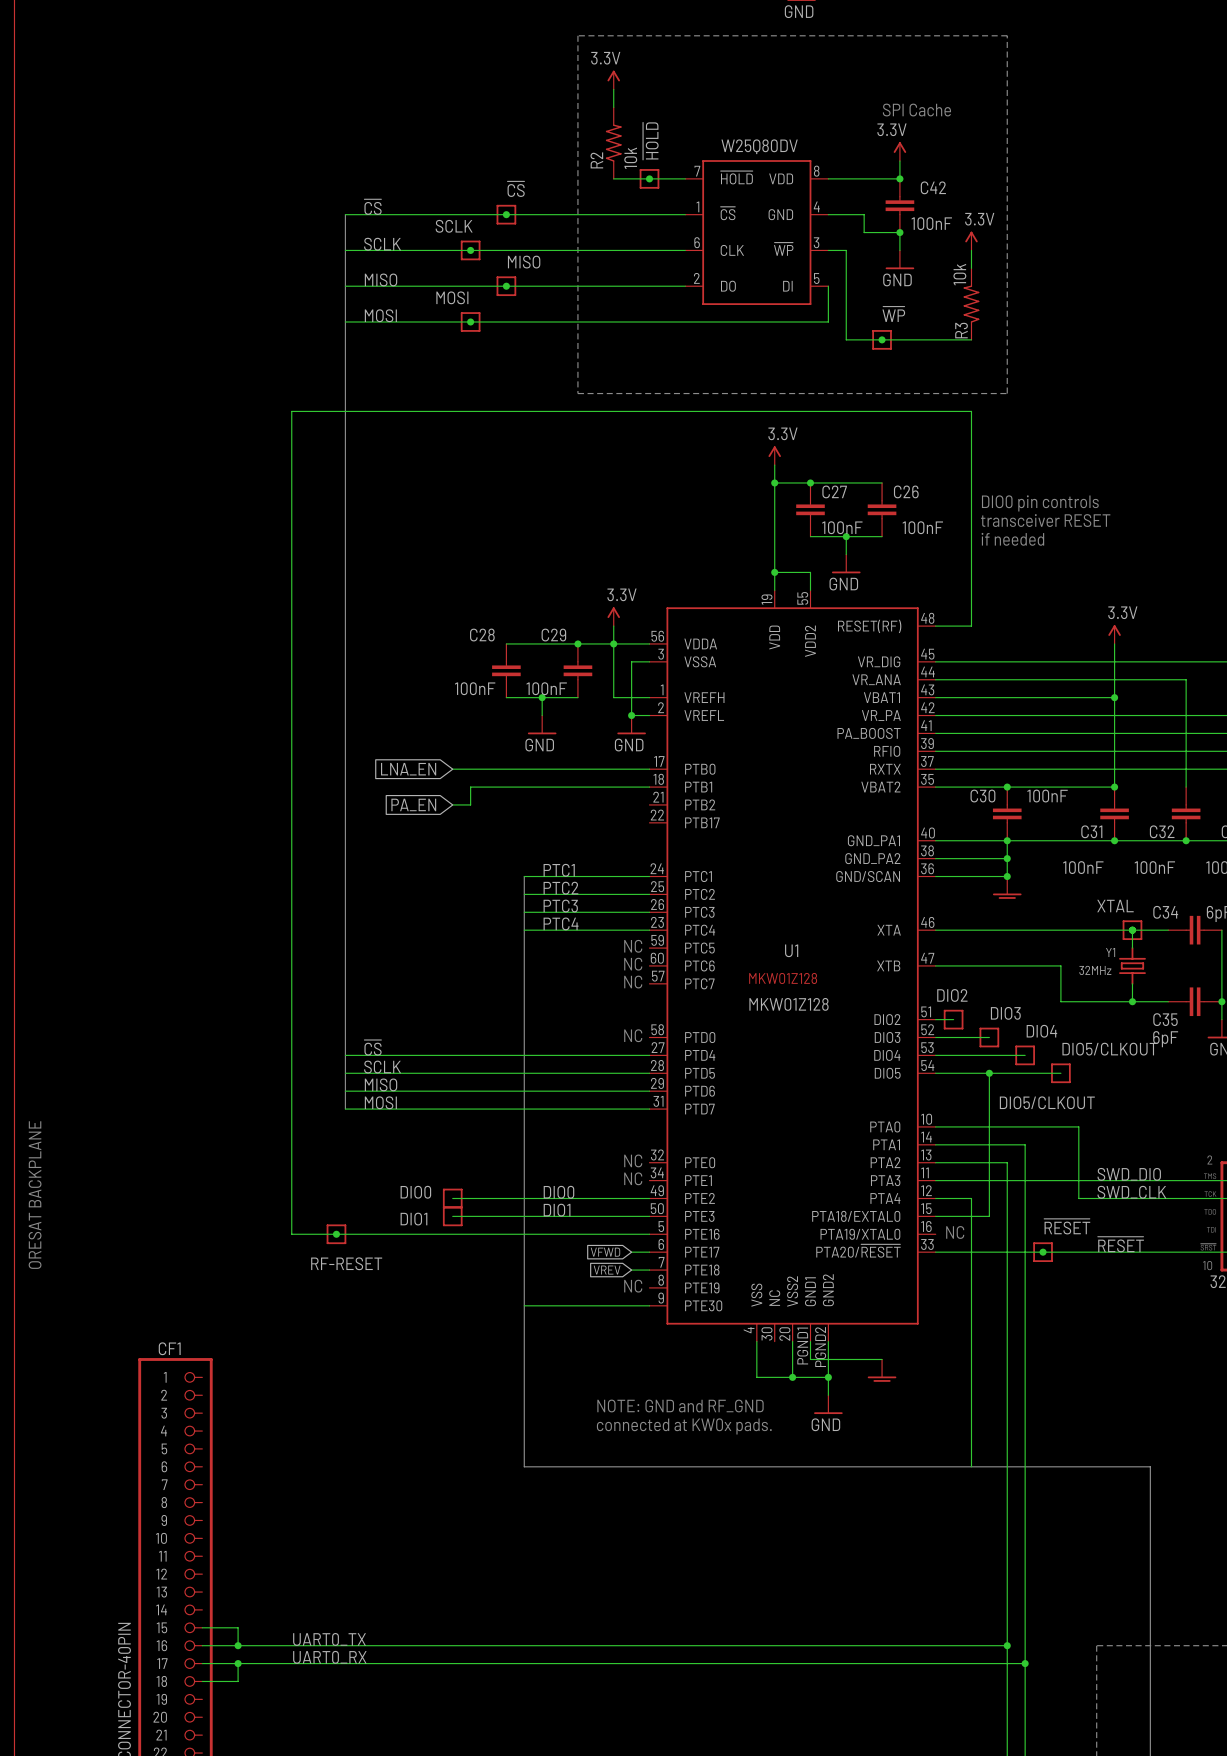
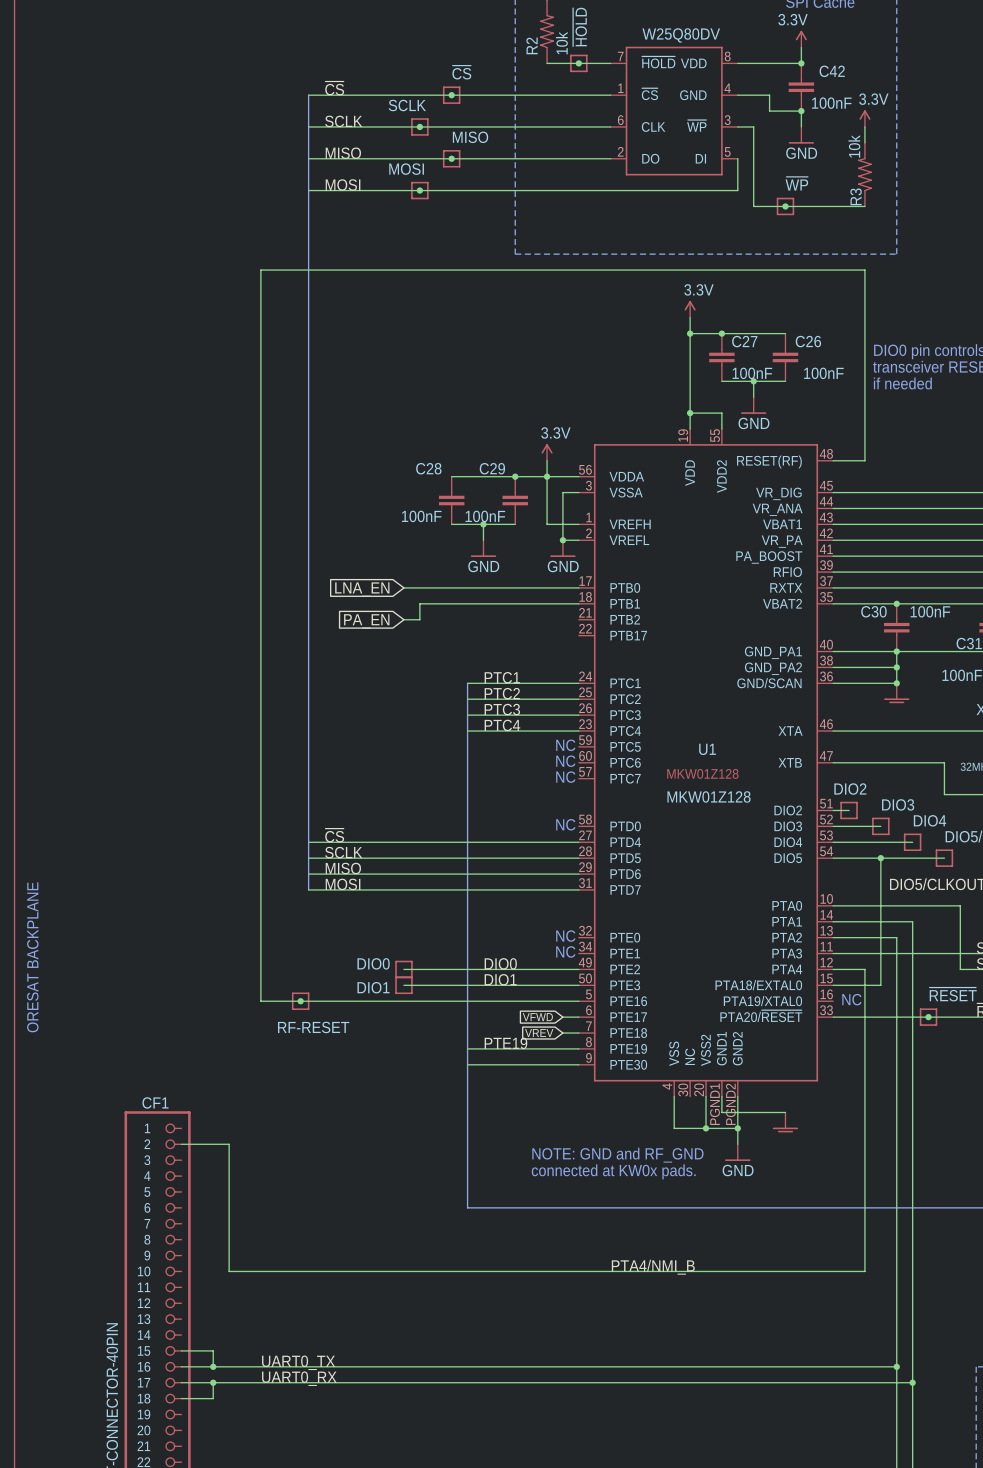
label: none -> PTE19 (505, 1043)
text: NC (633, 1286) -> none
wire: none -> (467, 1048) (578, 1048)
wire: none -> (181, 1144) (229, 1144) (229, 1271) (864, 1271) (864, 1207)
label: none -> PTA4/NMI_B (653, 1267)

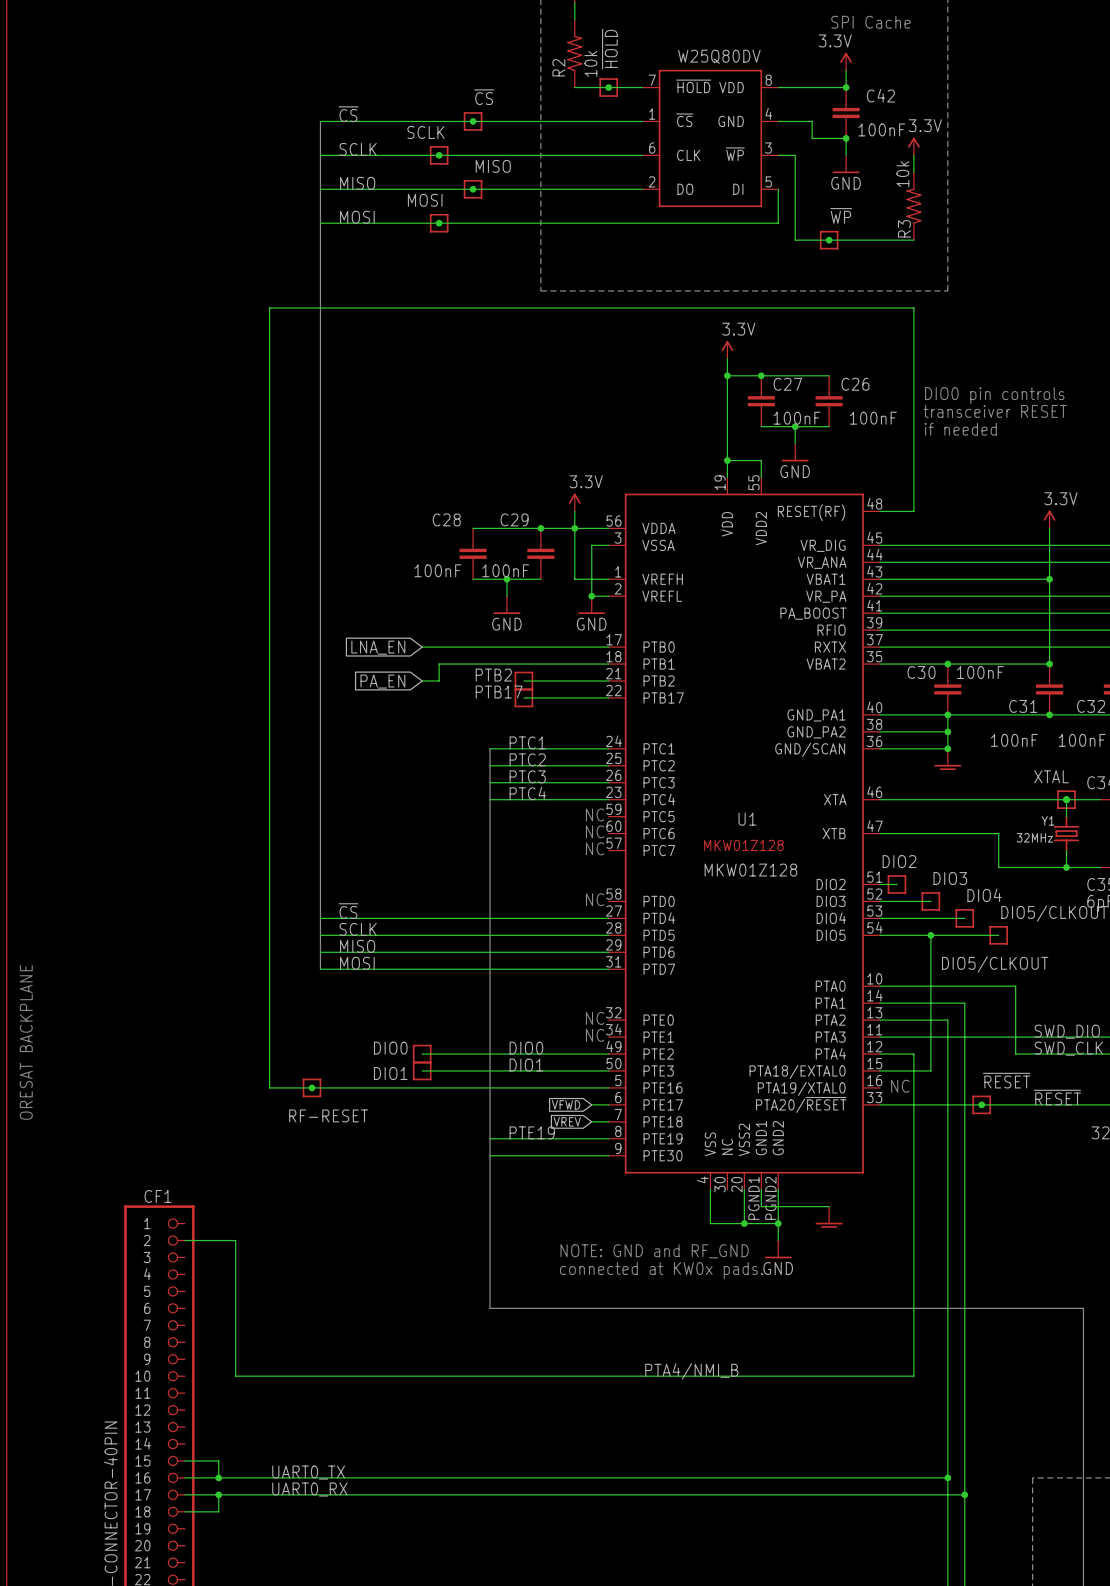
wire: none -> (523, 681) (608, 681)
PTB2: none -> (523, 681)
wire: none -> (523, 697) (608, 697)
PTB17: none -> (523, 697)

